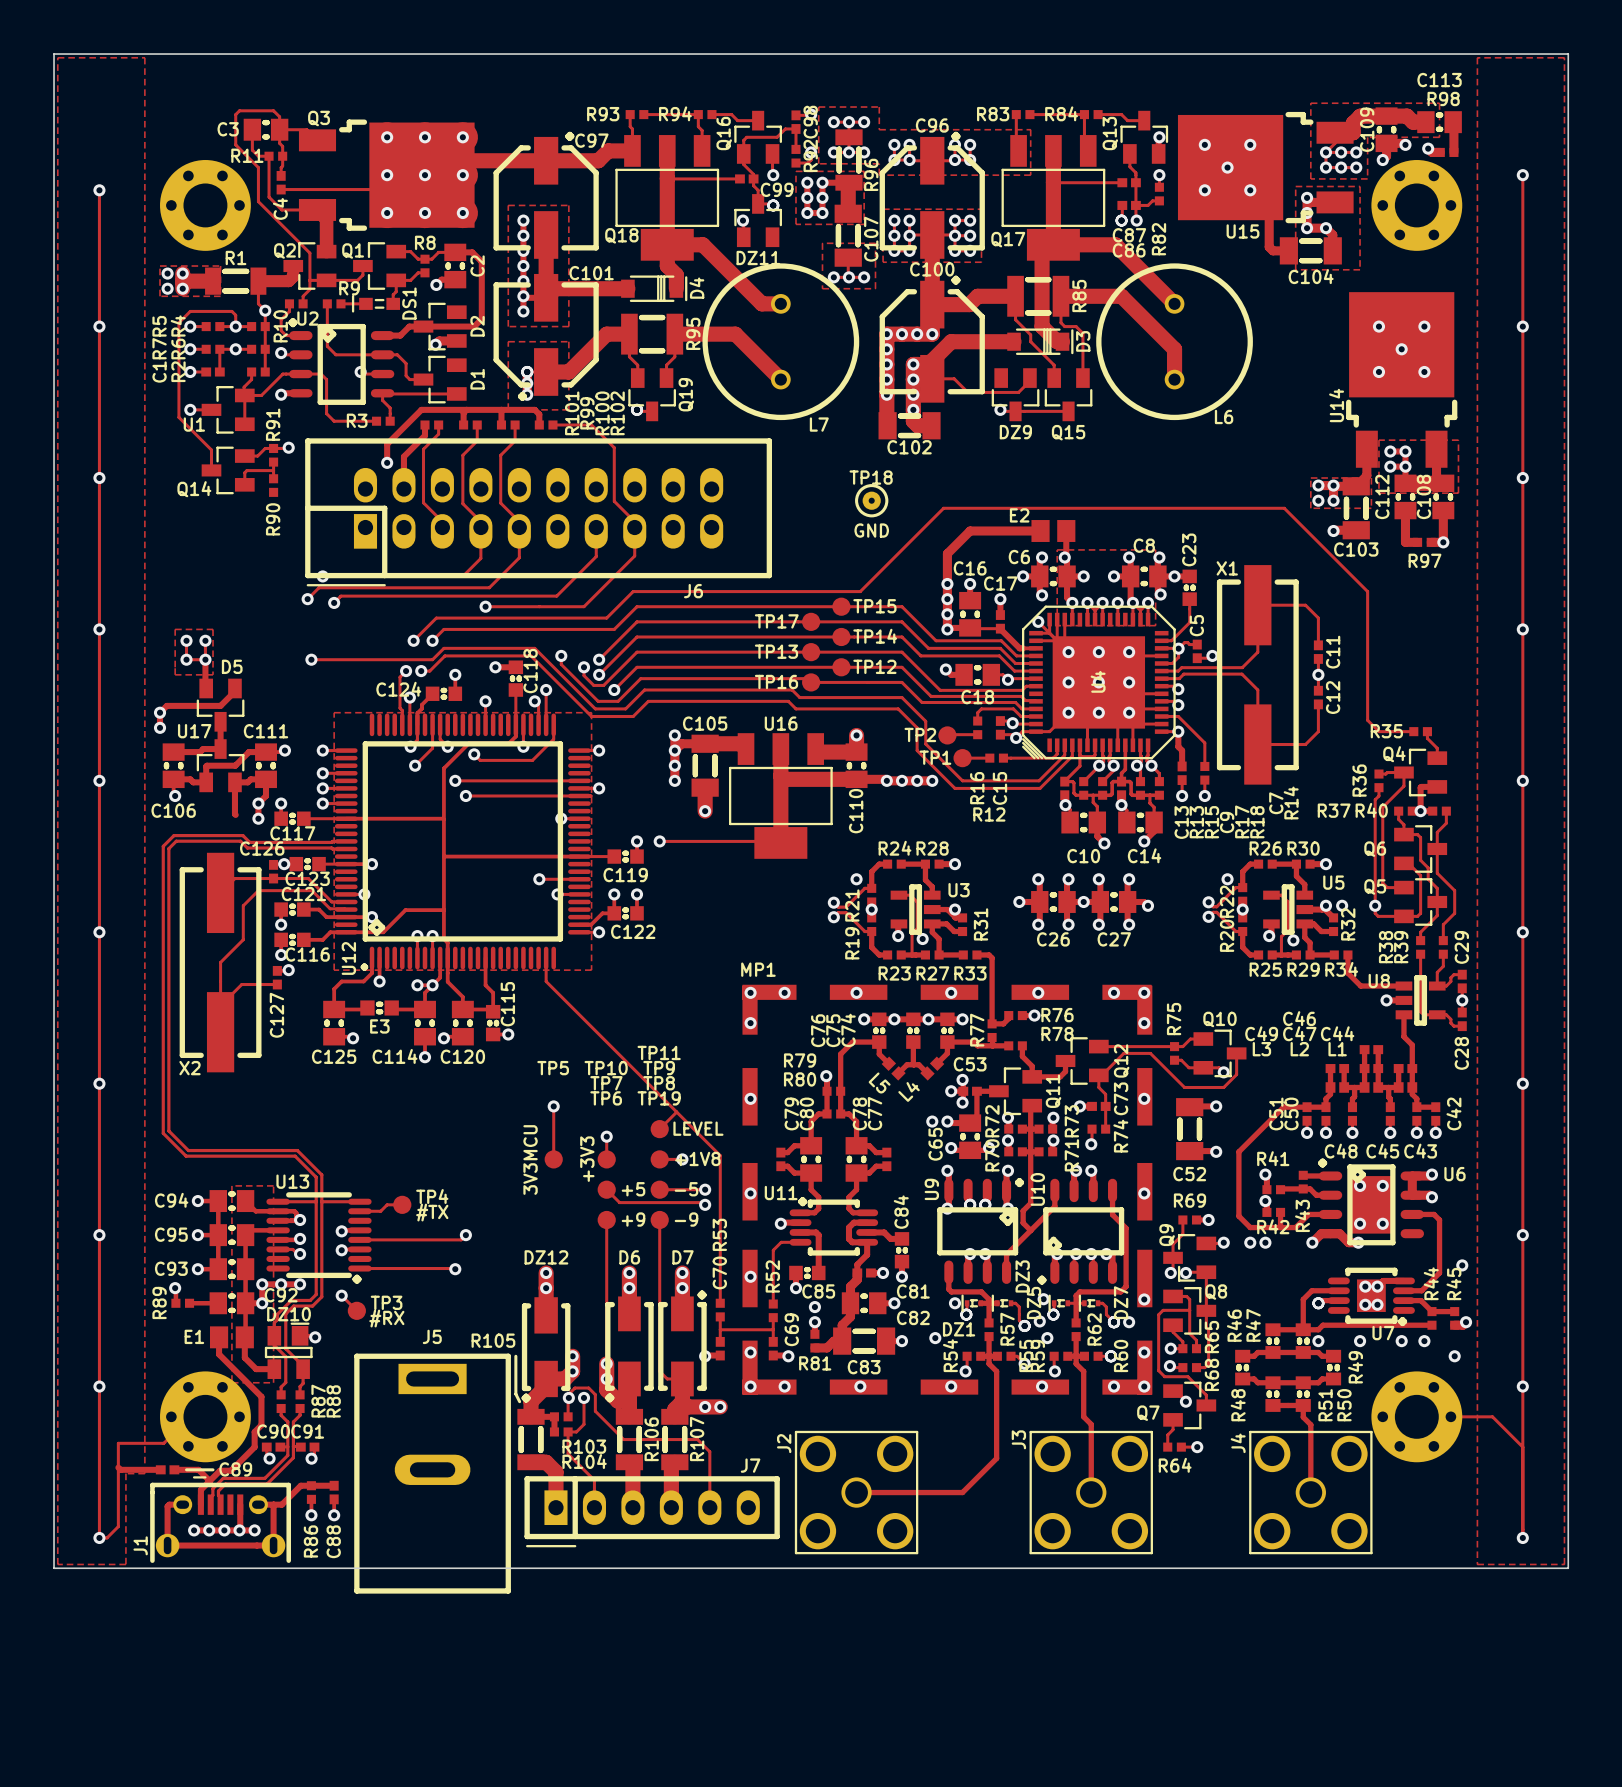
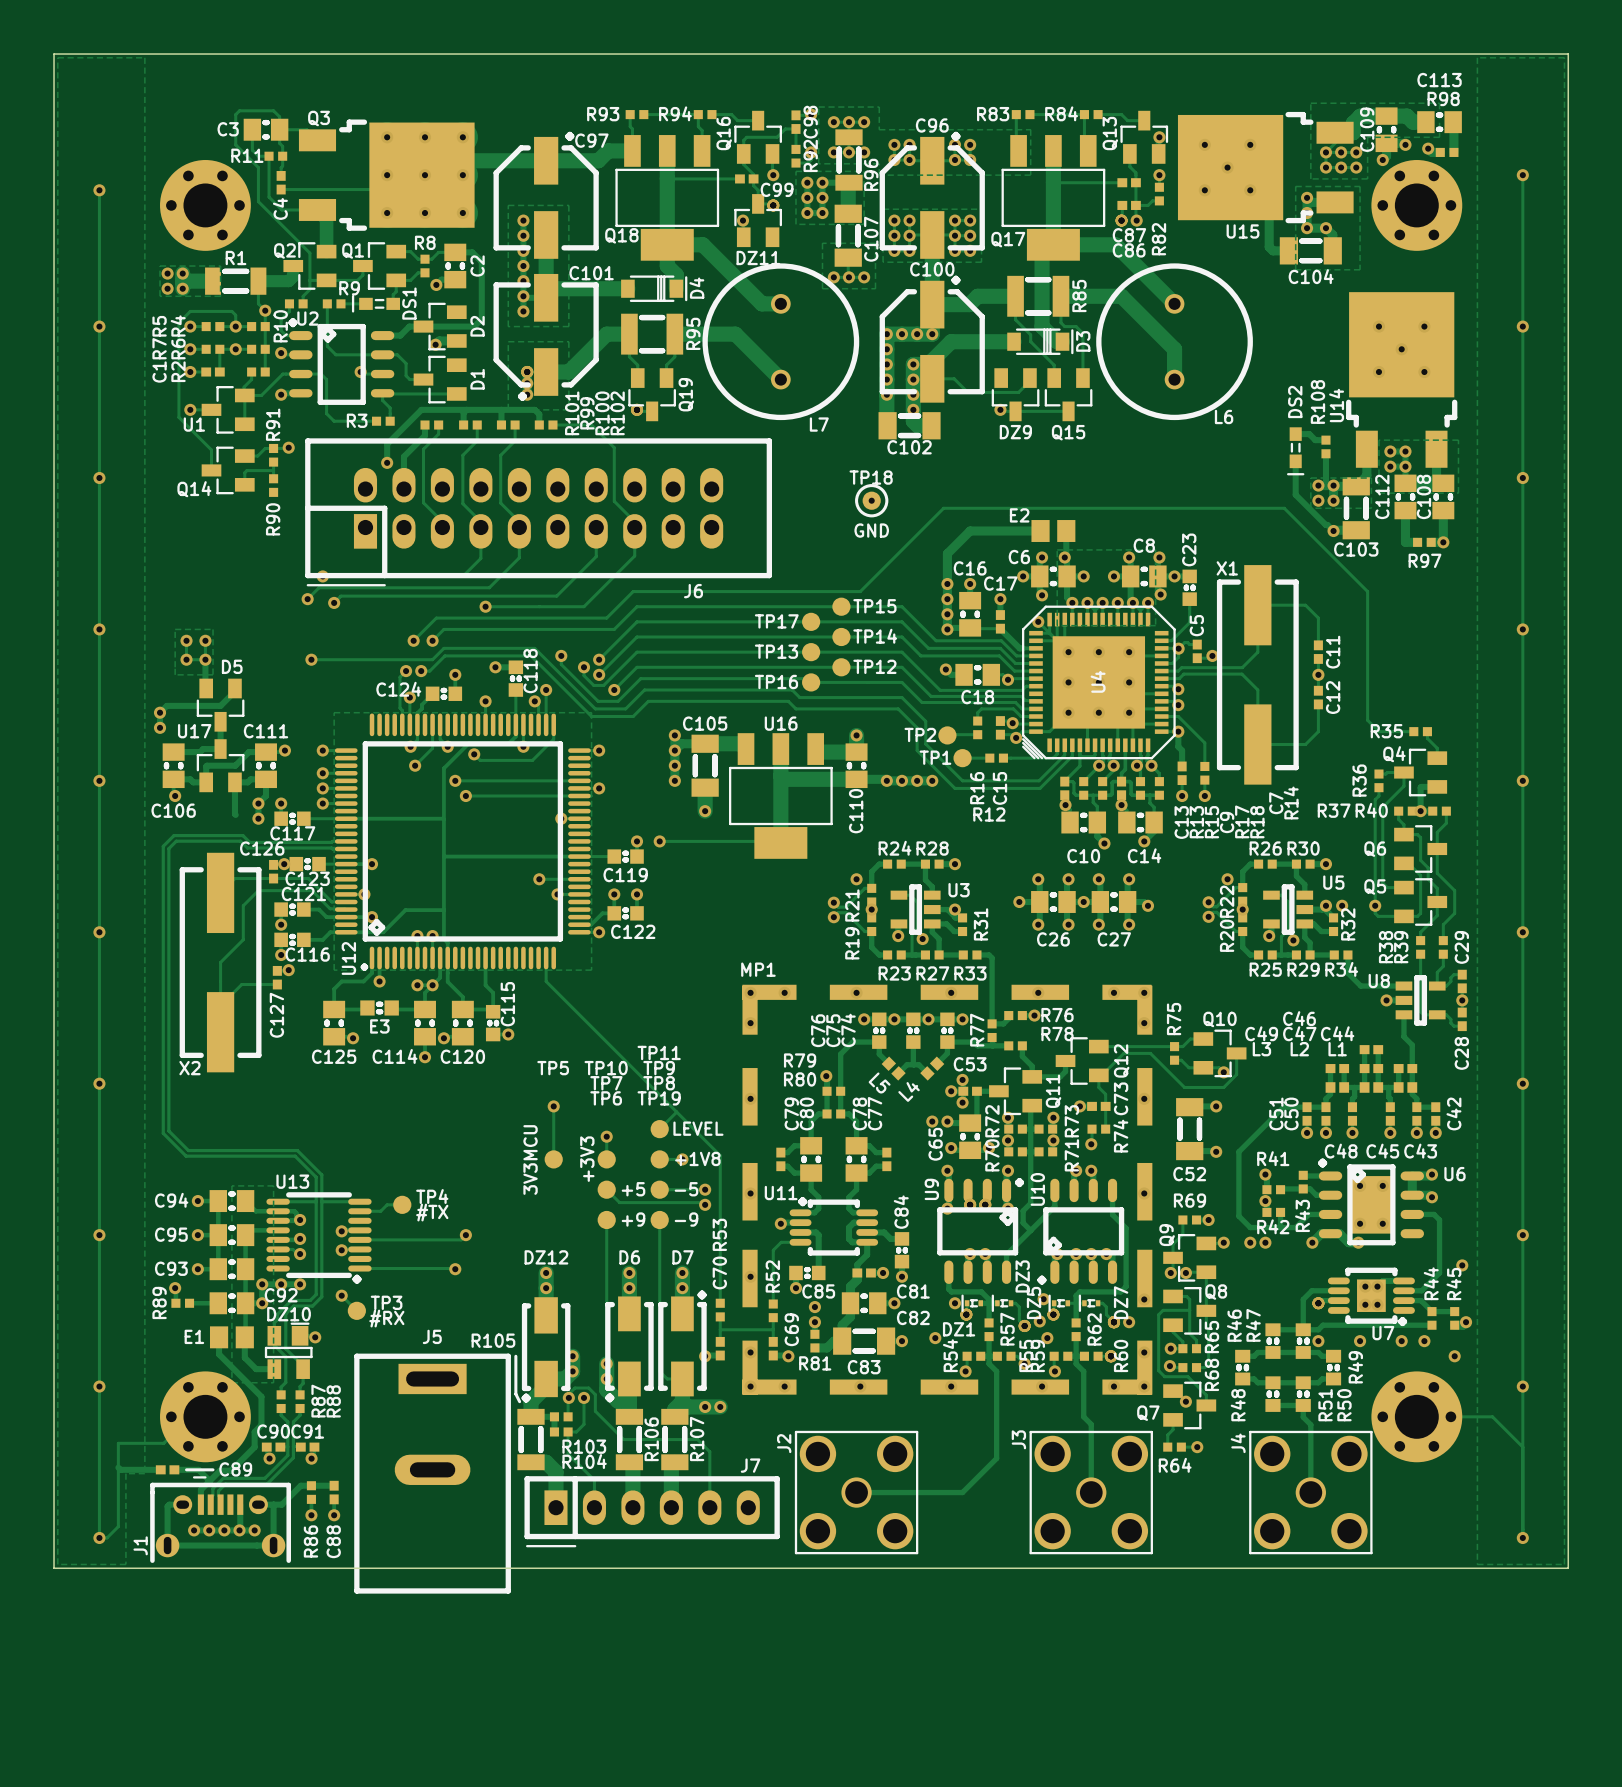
track: none -> (1295, 434) (1309, 434) (1315, 440) (1325, 440)
R108: none -> (1325, 446)
DS2: none -> (1295, 451)
track: none -> (1325, 453) (1325, 485)
track: none -> (1295, 461) (1295, 494) (1333, 531)

